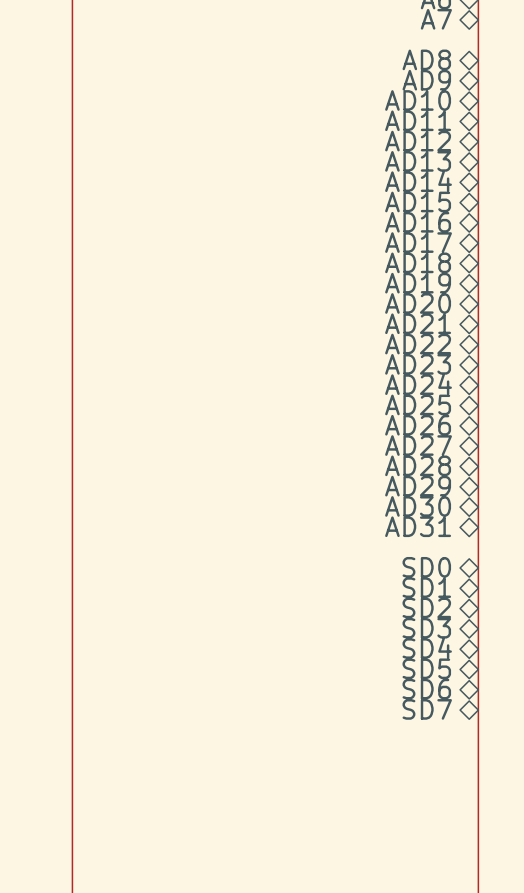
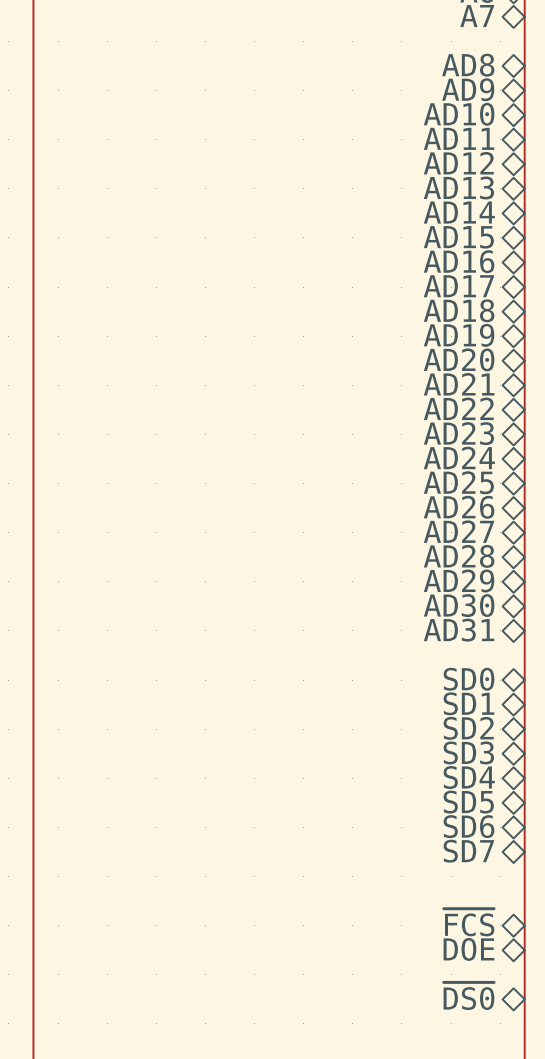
sheet pin: none -> ~{FCS} (469, 922)
sheet pin: none -> DOE (468, 949)
sheet pin: none -> ~{DS0} (468, 996)

